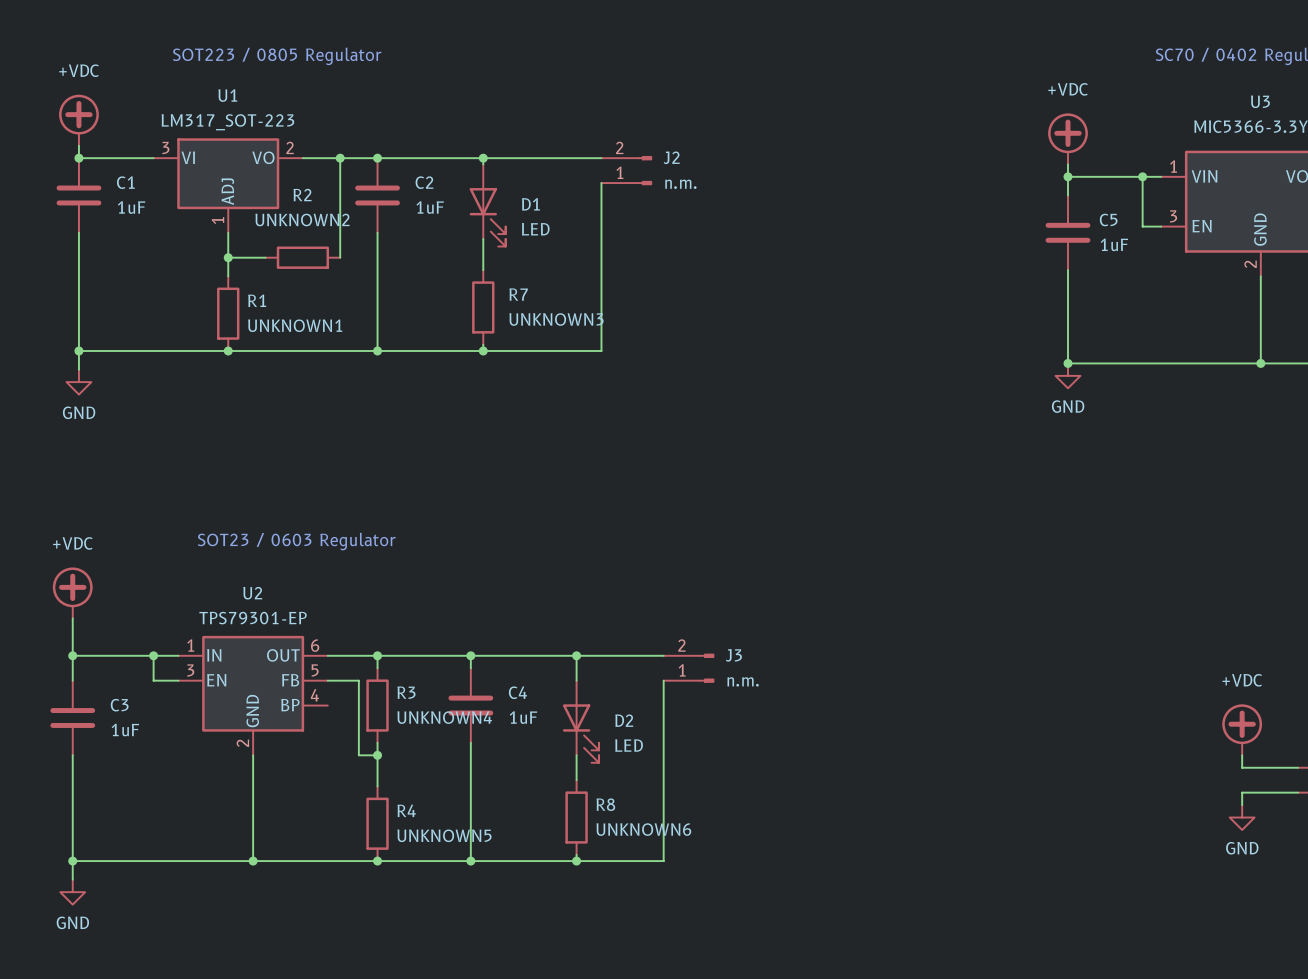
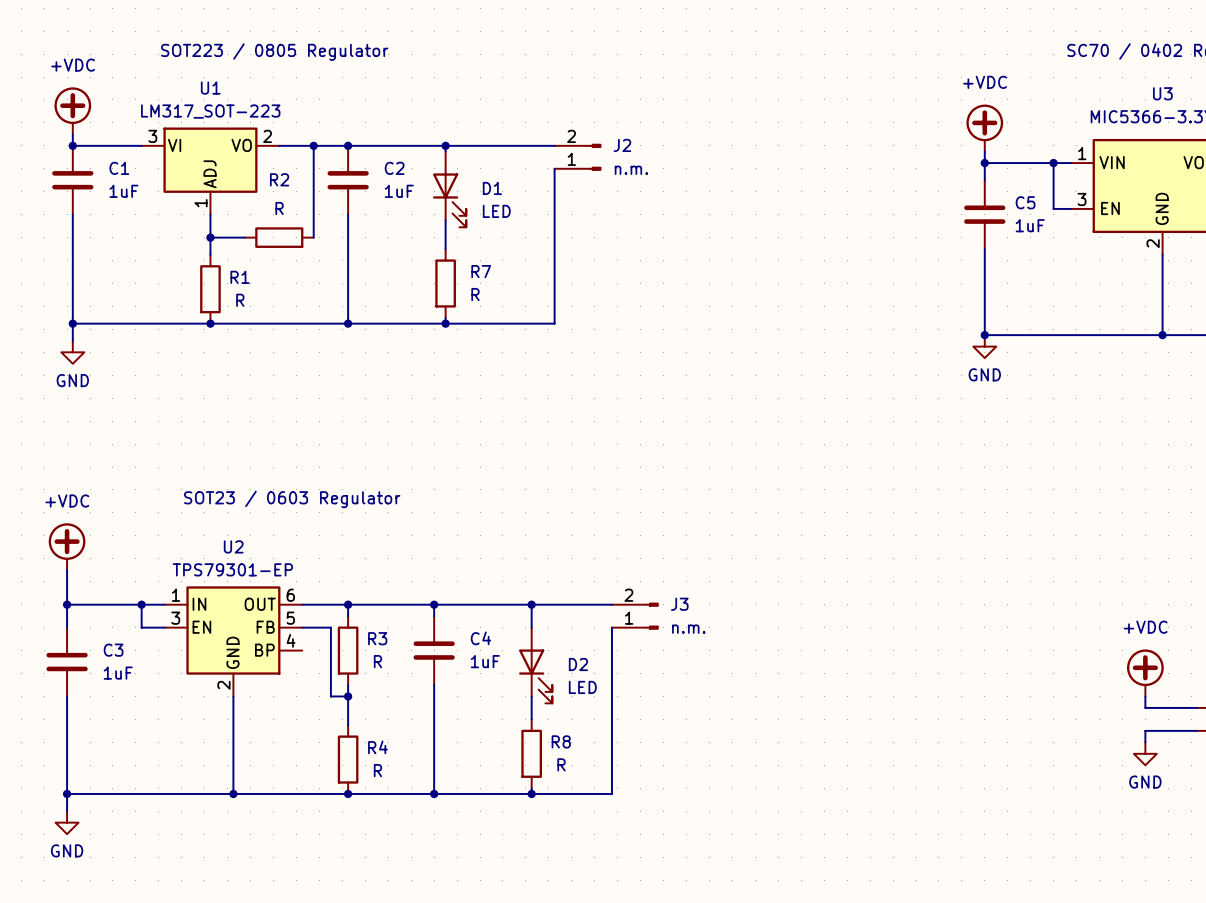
R2 value: UNKNOWN2 (302, 219) -> R (279, 208)
R7 value: UNKNOWN3 (556, 319) -> R (475, 294)
R1 value: UNKNOWN1 (295, 325) -> R (240, 300)
R3 value: UNKNOWN4 (444, 717) -> R (377, 661)
R8 value: UNKNOWN6 (643, 829) -> R (561, 764)
R4 value: UNKNOWN5 (444, 835) -> R (377, 770)

